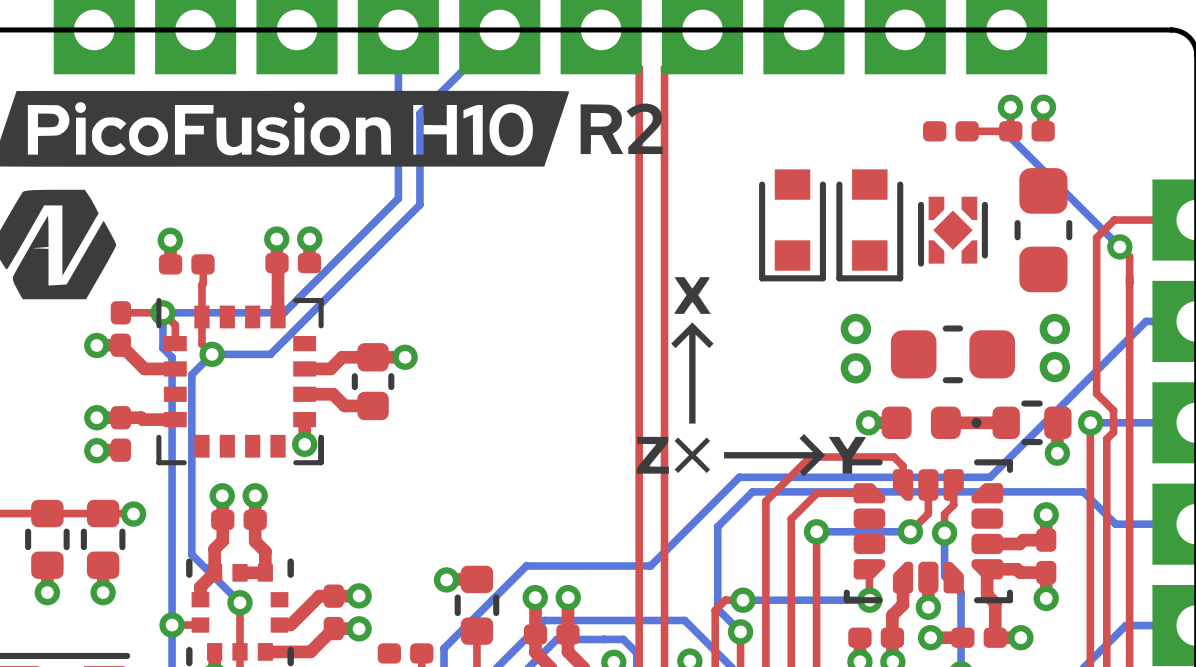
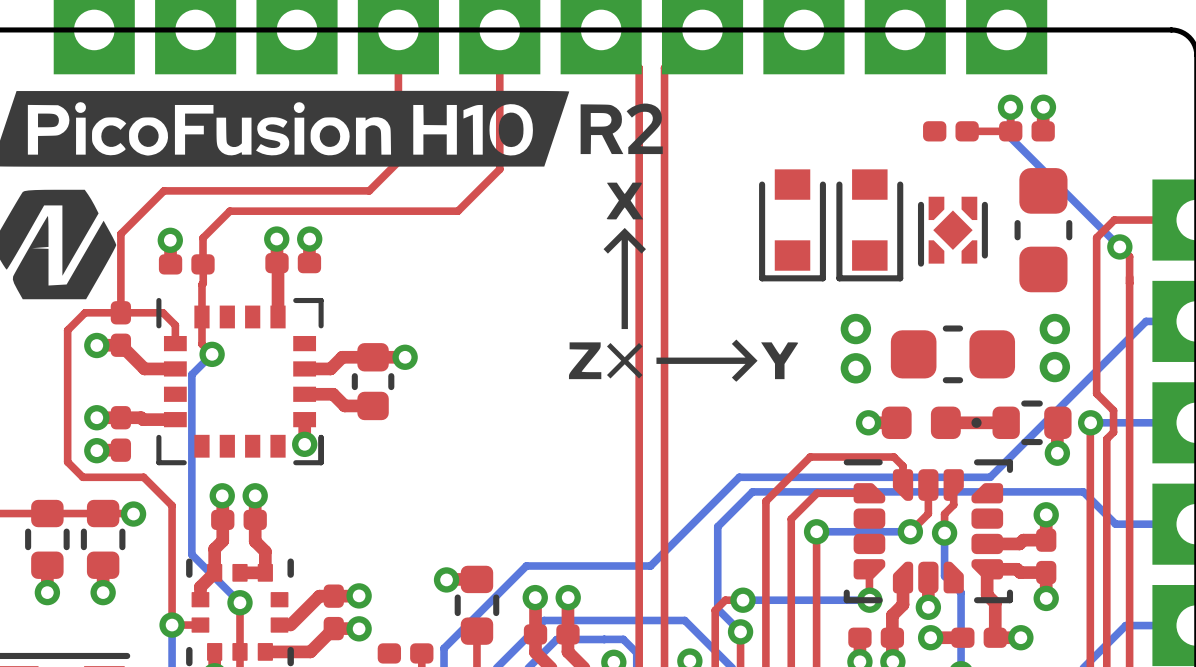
top track: none -> (398, 33) (398, 161) (369, 190) (163, 190) (120, 233) (120, 312) (85, 312) (67, 330) (67, 462) (82, 477) (143, 477) (172, 505) (172, 625)
bottom track: (398, 33) (398, 198) (284, 312) (162, 312) (162, 348) (172, 357) (172, 625) -> none
top track: none -> (499, 33) (499, 169) (457, 211) (229, 211) (202, 238) (203, 264)
bottom track: (499, 33) (419, 113) (419, 204) (270, 354) (212, 354) -> none
via: (162, 312) -> none
drawing position: (751, 376) -> (683, 282)

